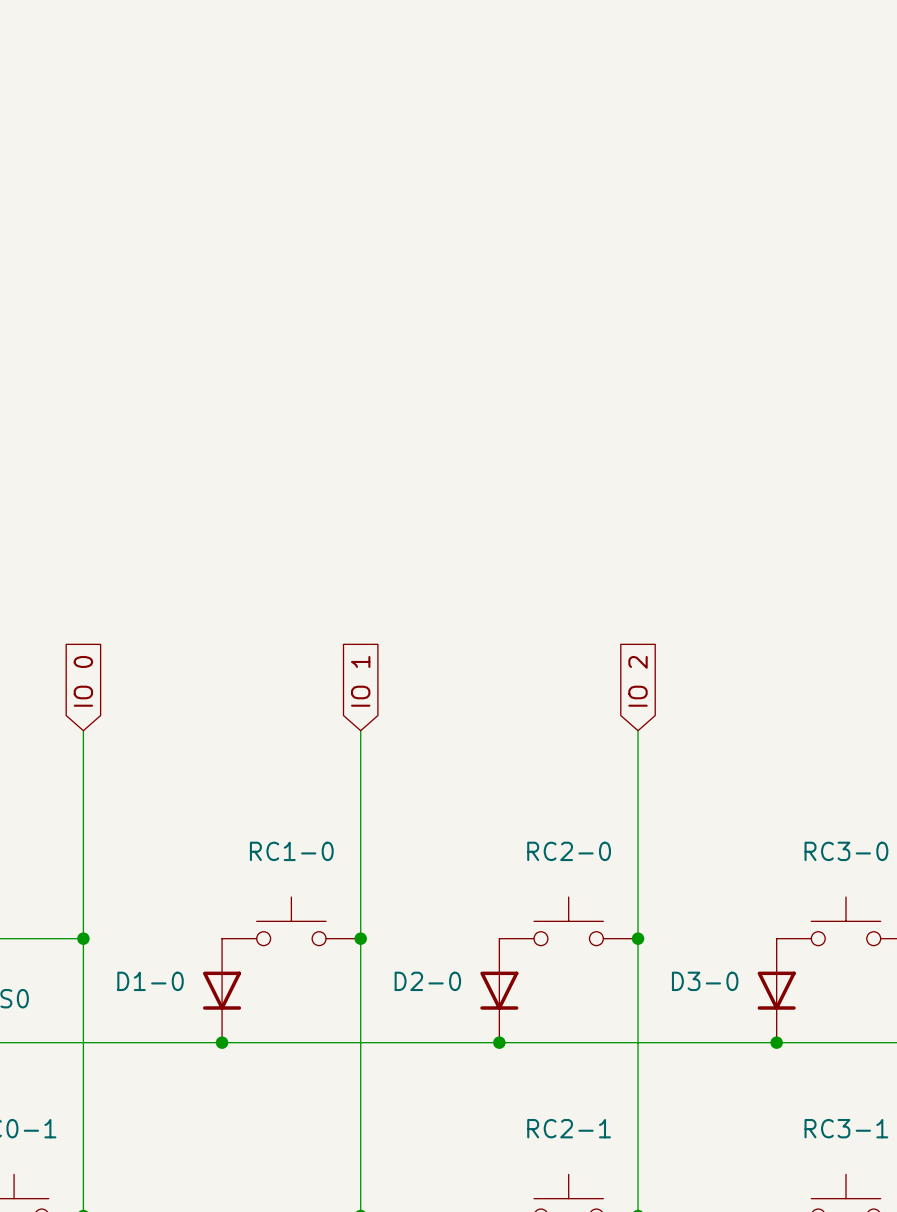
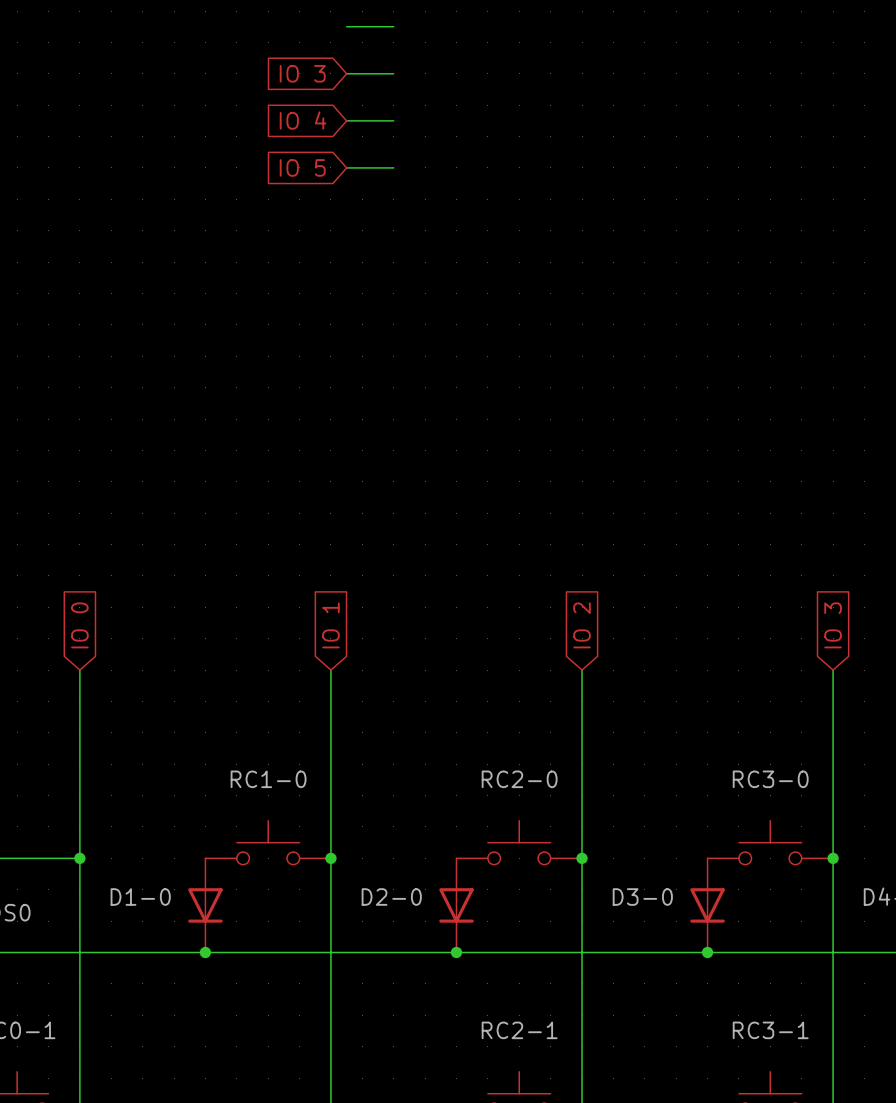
wire: none -> (346, 26) (393, 26)
global label: none -> IO 3 (302, 73)
wire: none -> (346, 73) (393, 73)
global label: none -> IO 4 (303, 120)
wire: none -> (346, 120) (393, 120)
global label: none -> IO 5 (302, 167)
wire: none -> (346, 167) (393, 167)

